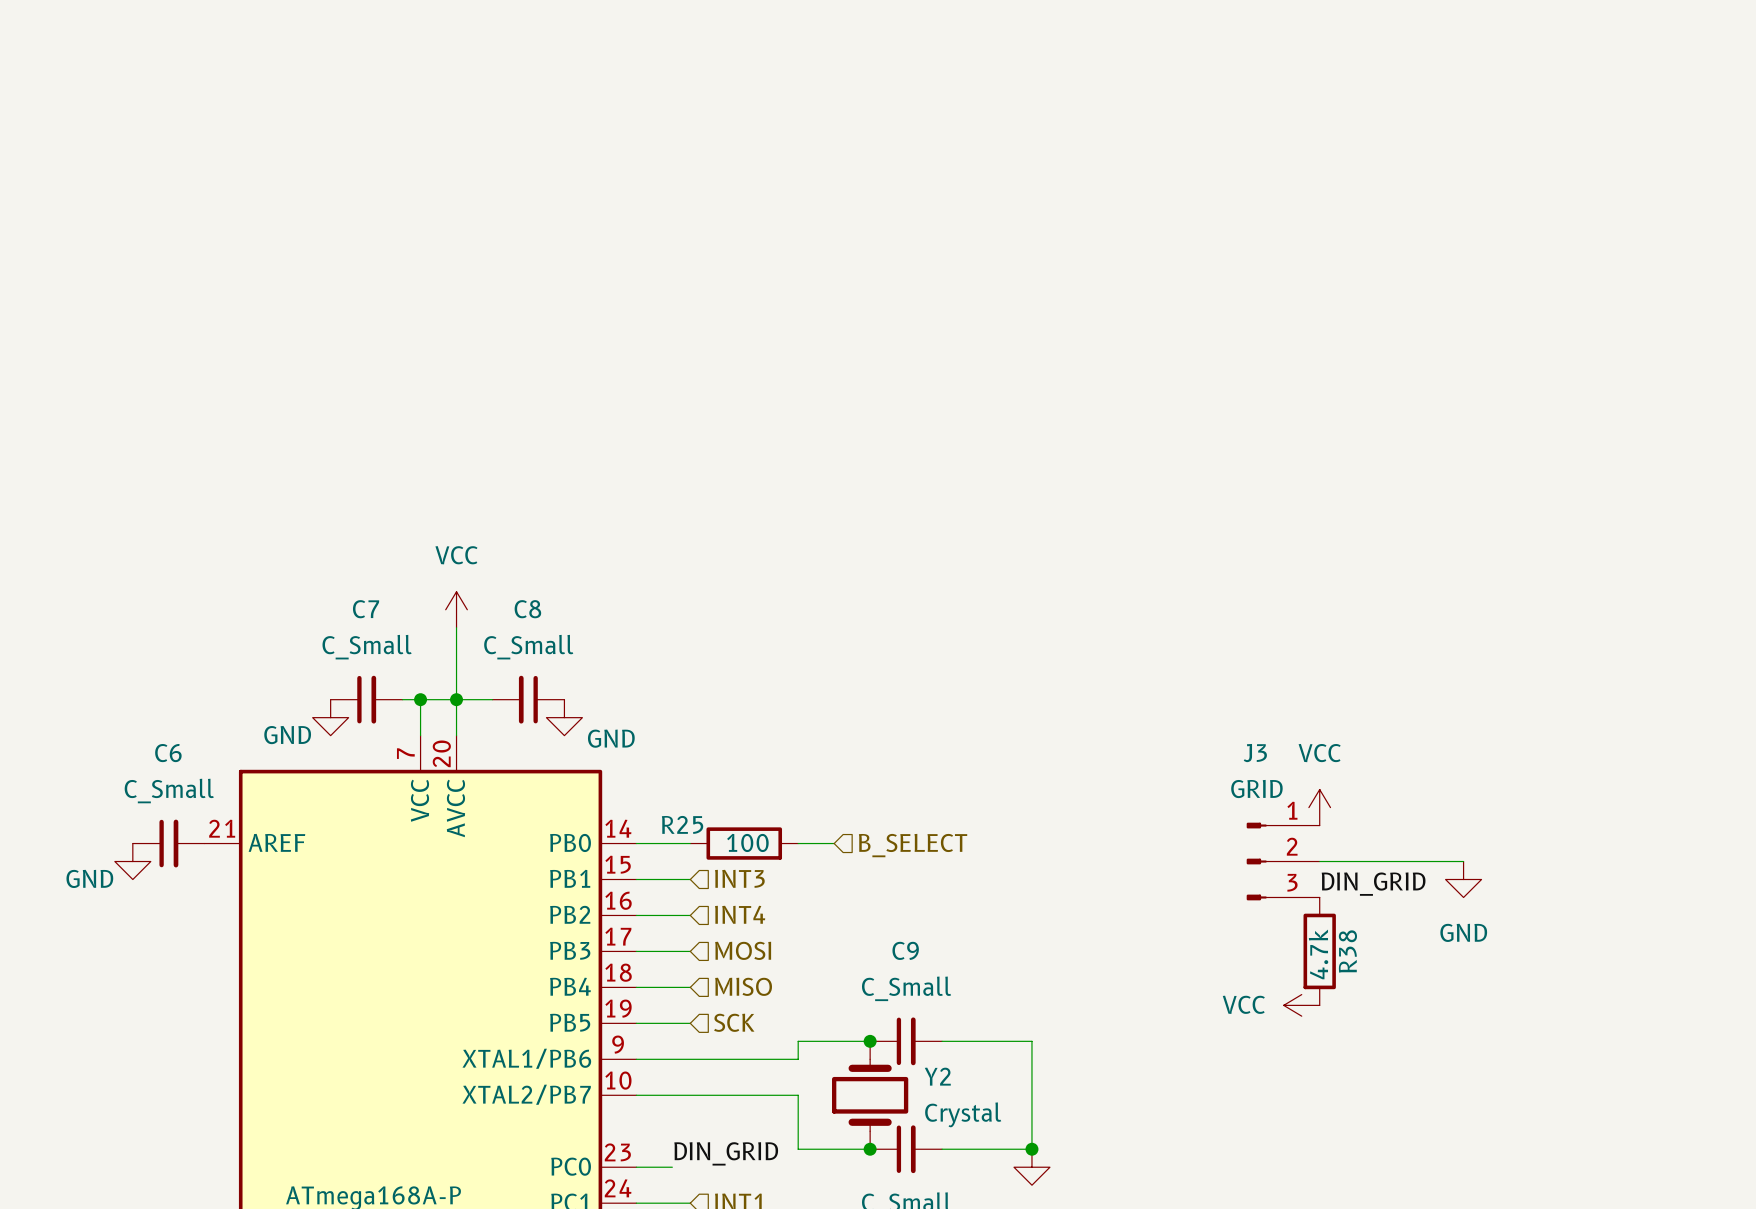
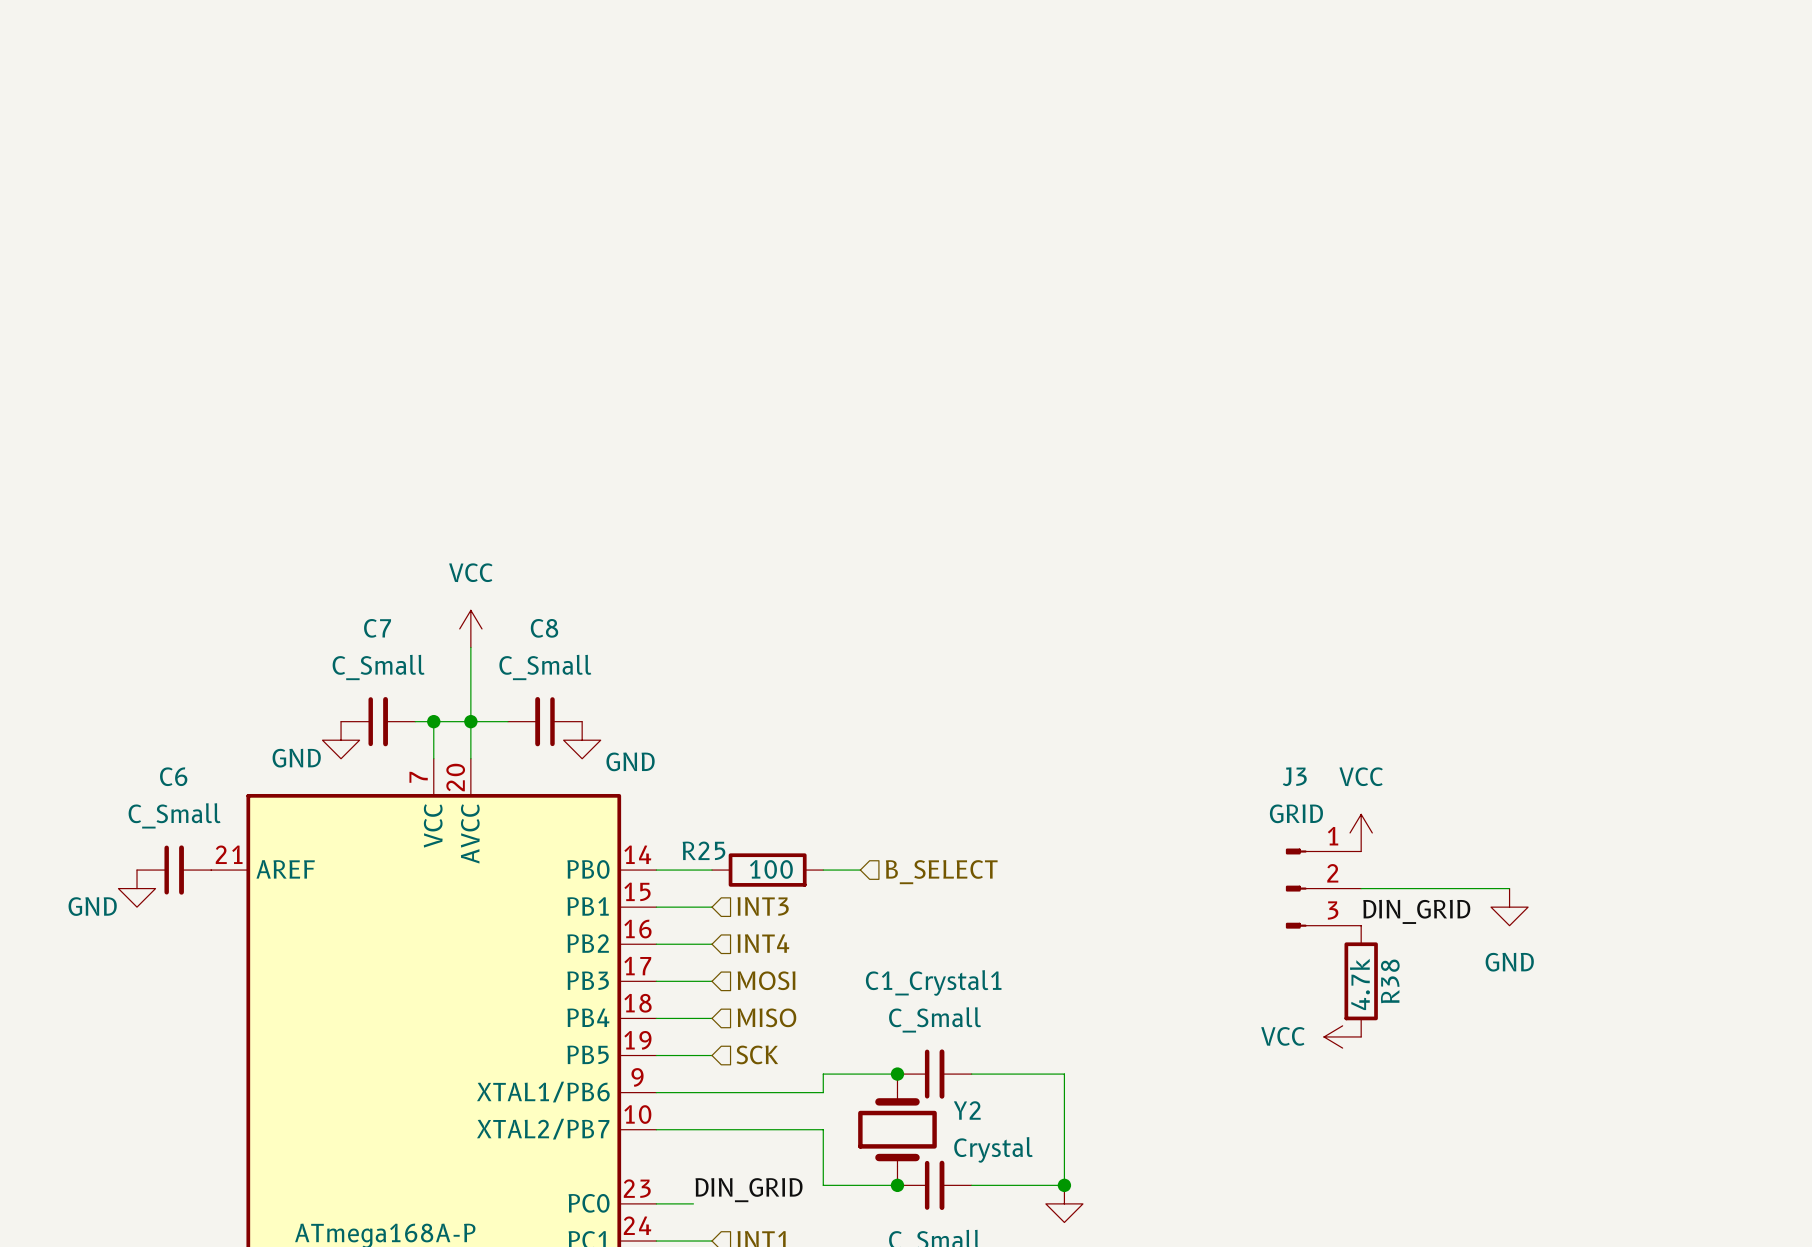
C9 name: C9 (905, 950) -> C1_Crystal1 (933, 982)

